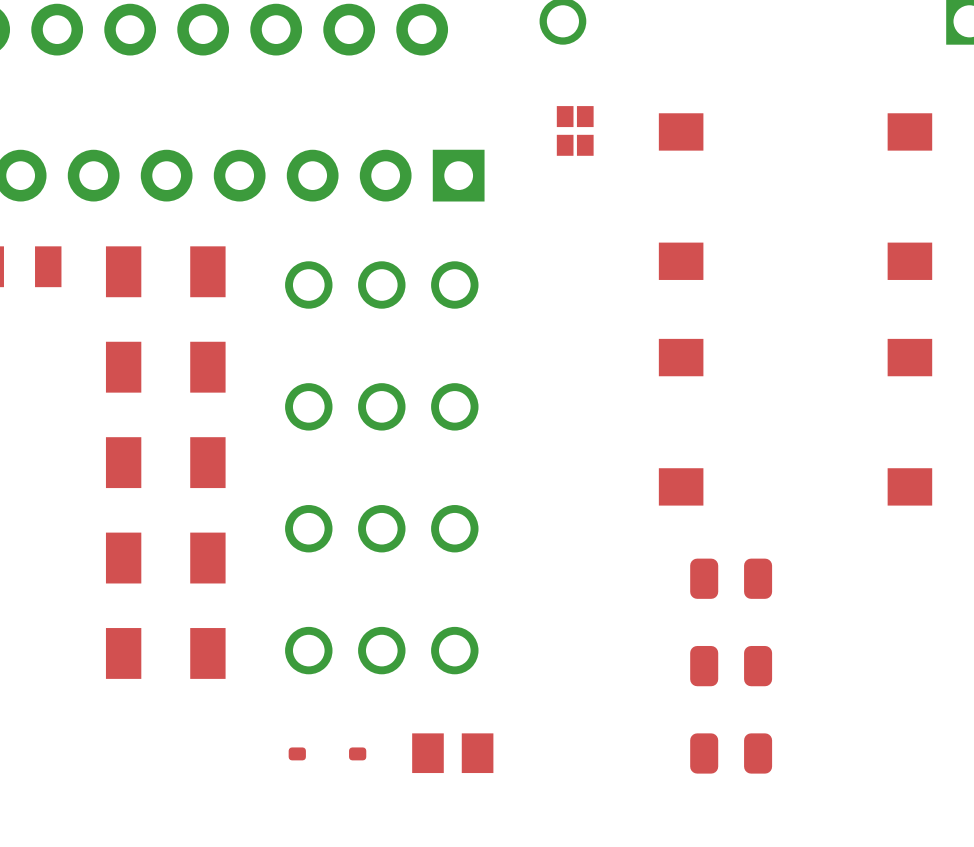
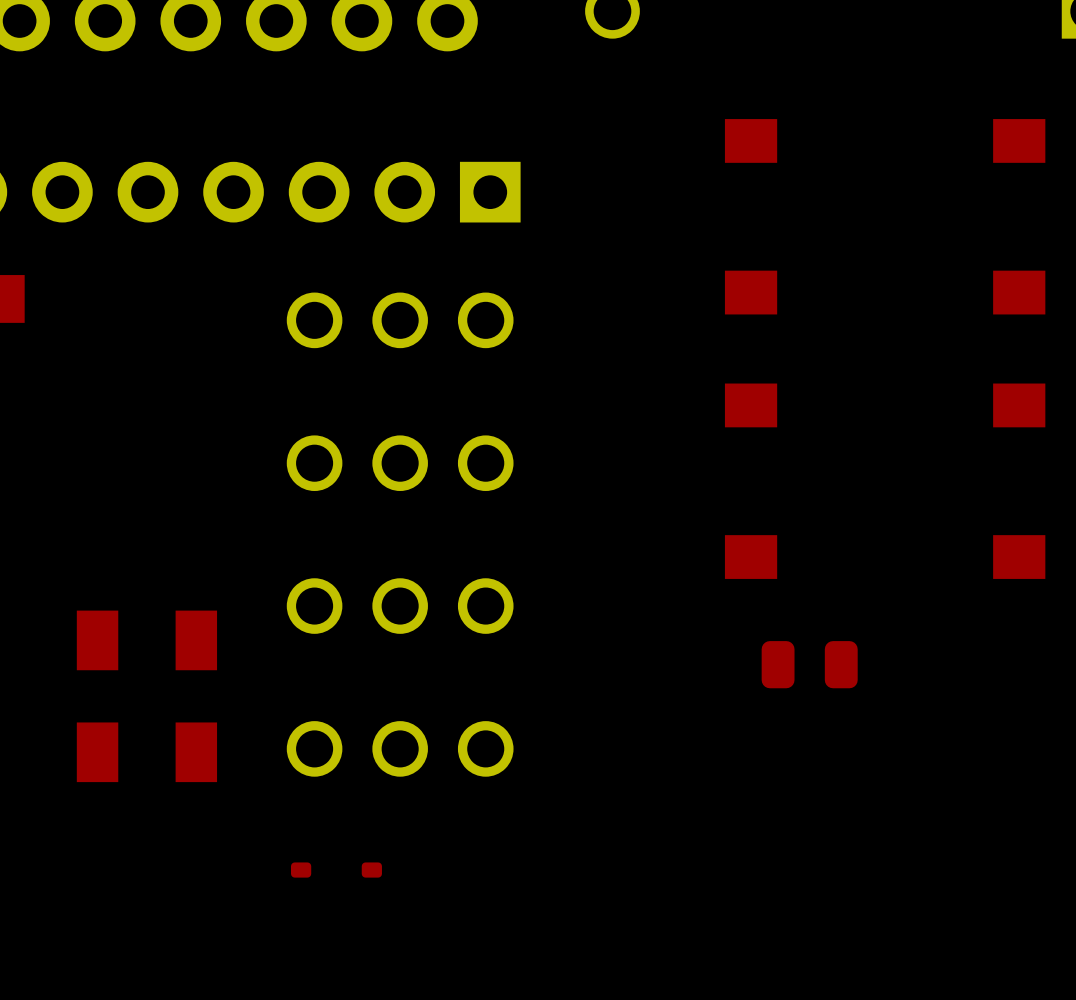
part: (575, 130) -> none
part: (165, 271) -> none
part: (165, 367) -> none
part: (165, 462) -> none
part: (731, 666) -> none
part: (452, 753) -> none
part: (731, 753) -> none

